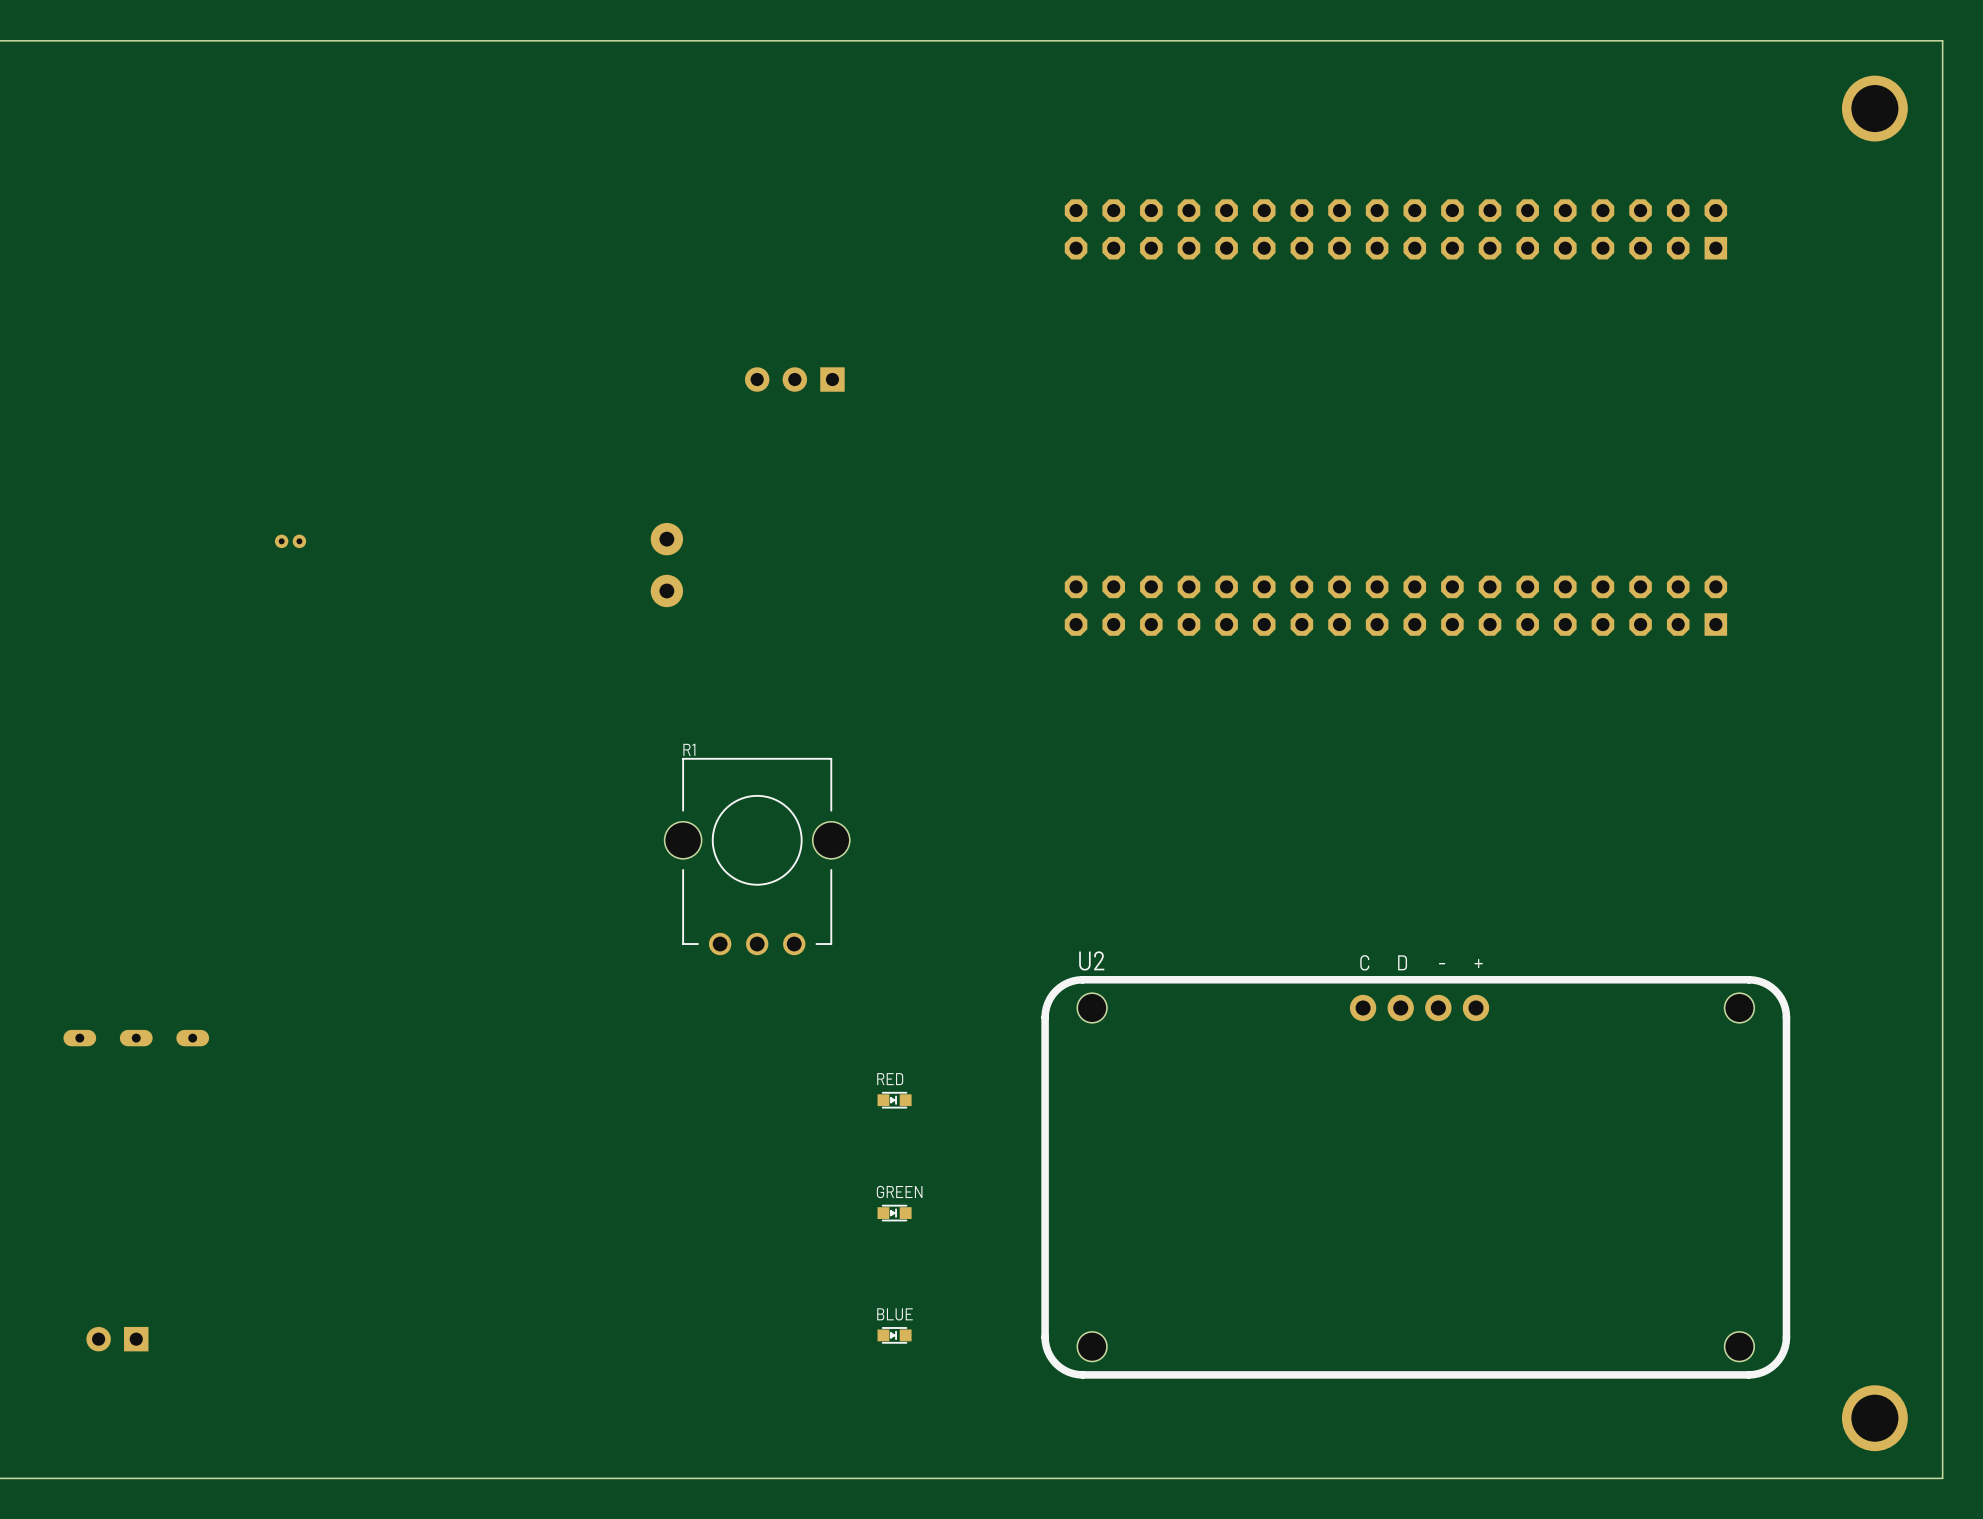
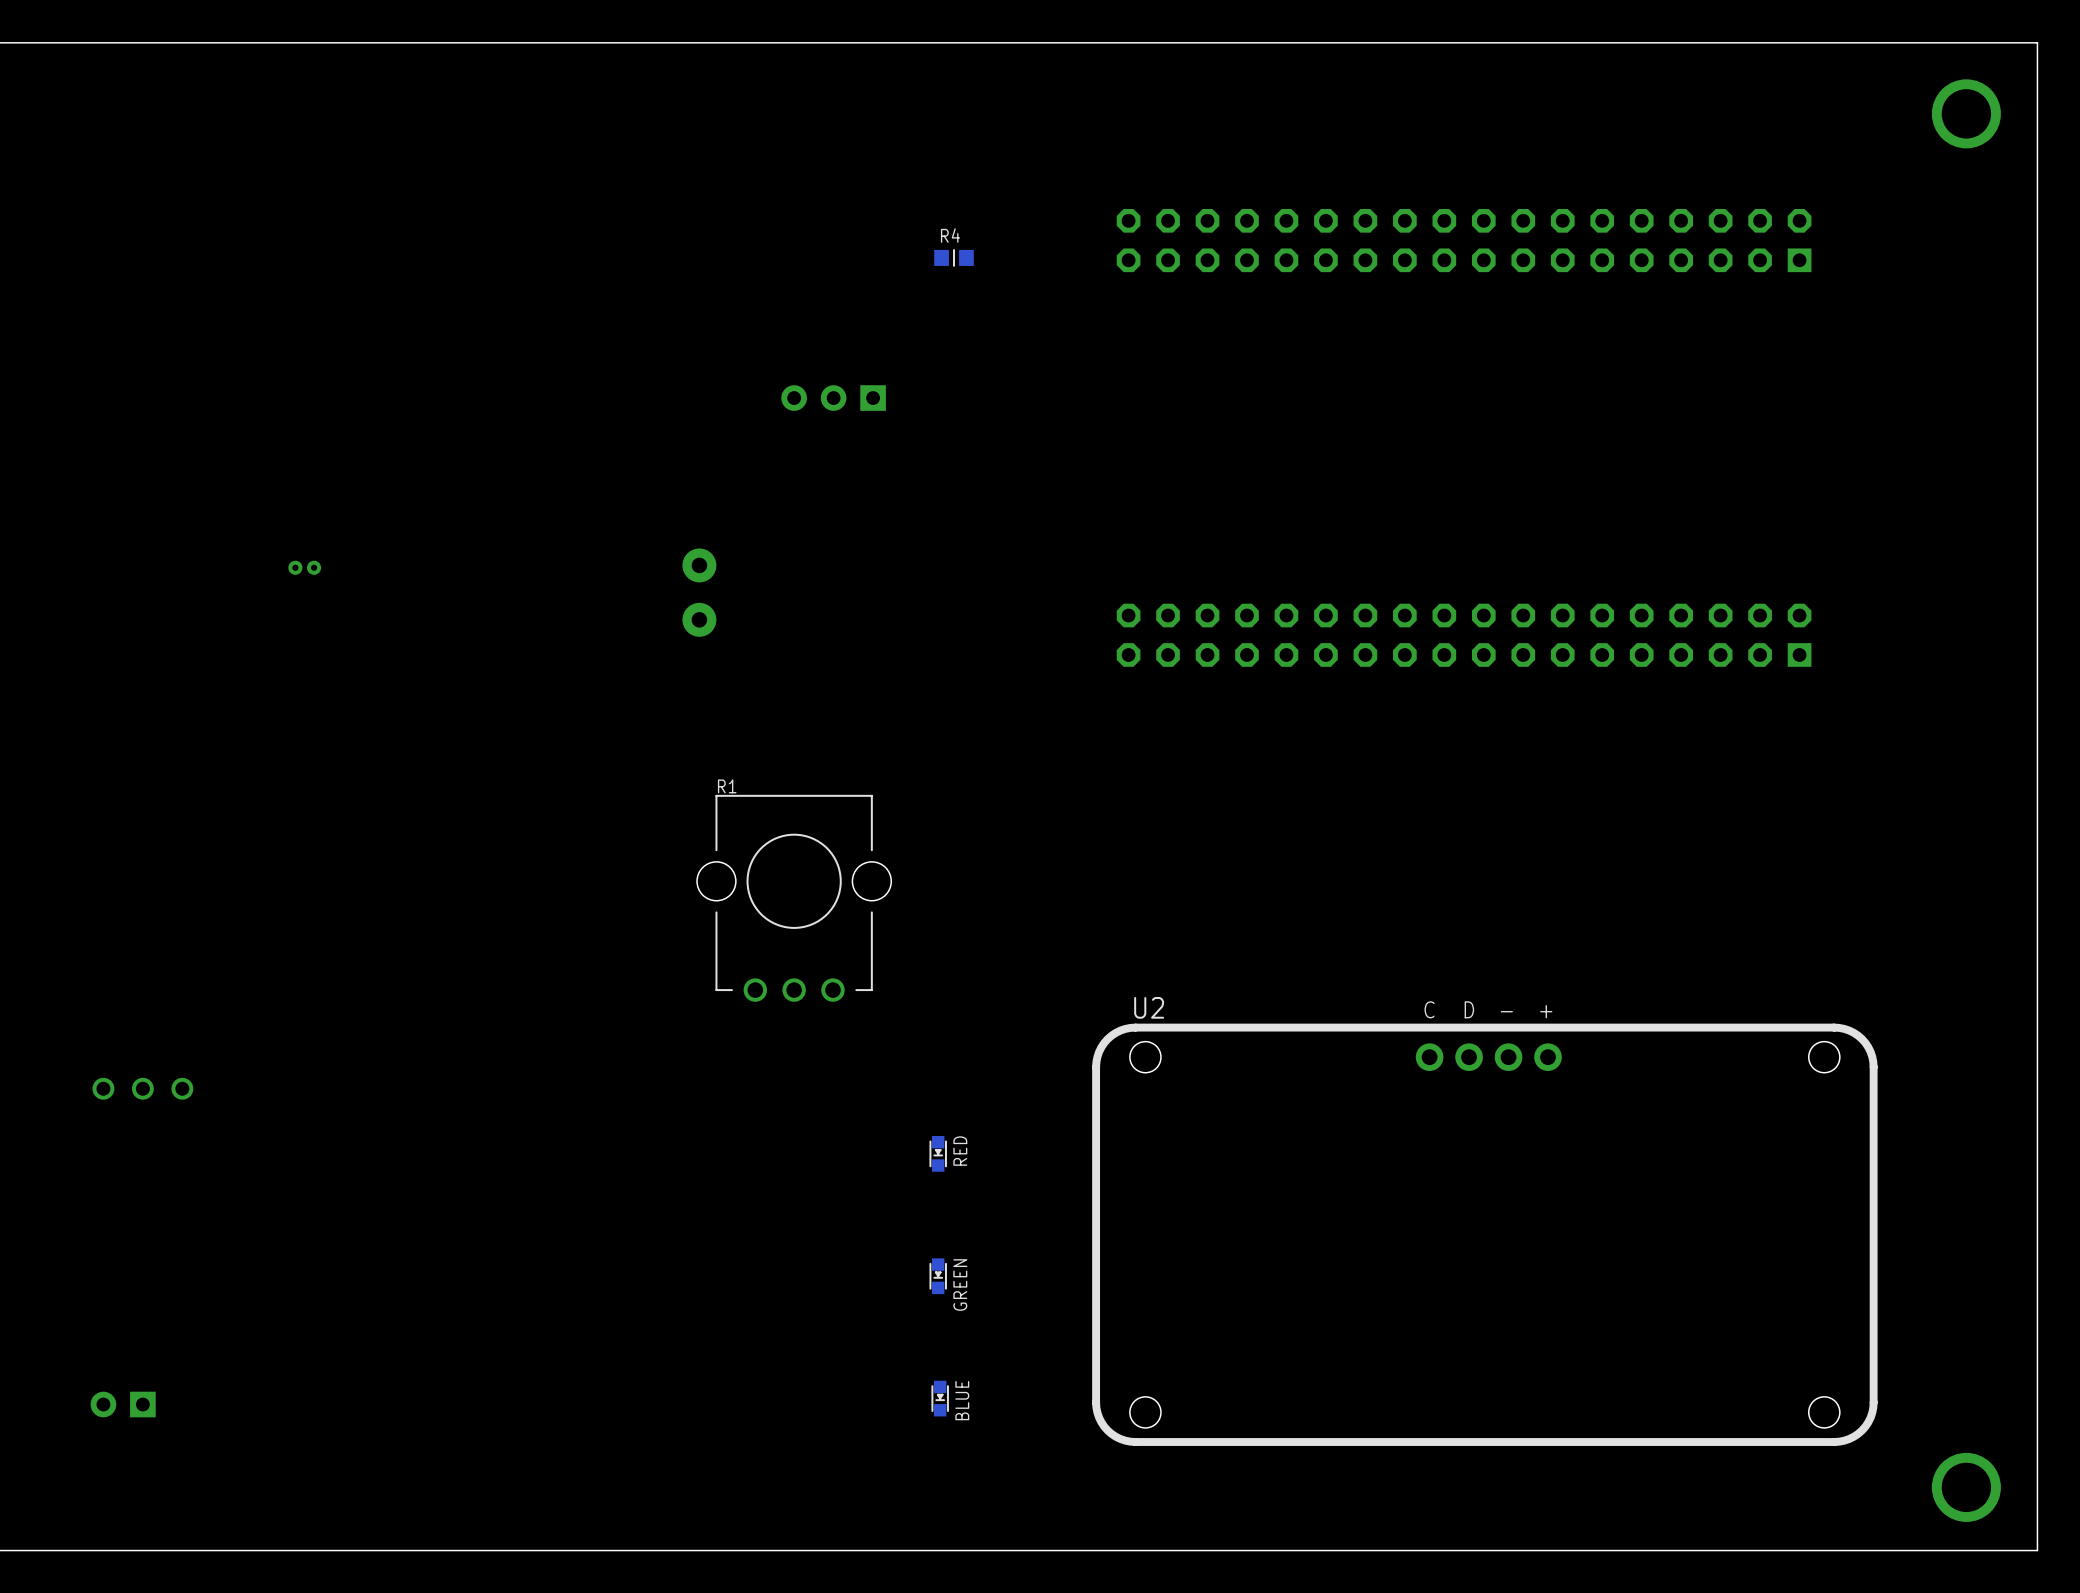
R4: none -> (954, 257)
part footprint: [63, 1029, 210, 1047] -> [92, 1077, 194, 1100]
RED rotation: 0° (894, 1100) -> 90° clockwise (938, 1153)
GREEN rotation: 0° (894, 1213) -> 90° clockwise (938, 1276)
BLUE rotation: 0° (894, 1335) -> 90° clockwise (940, 1398)

